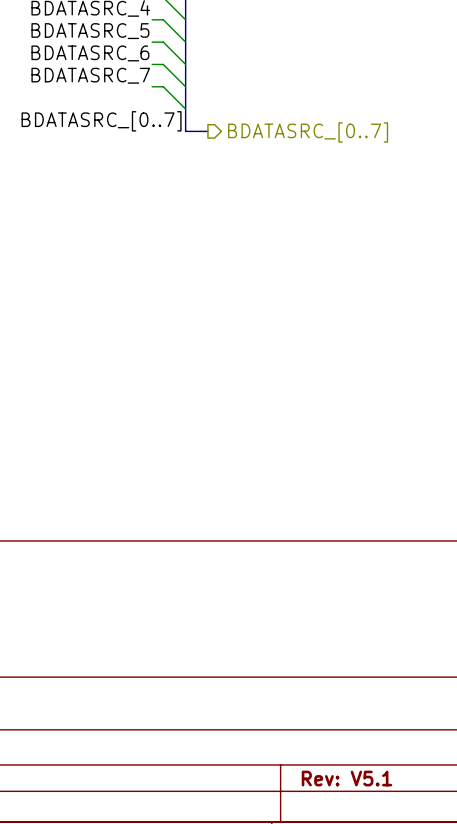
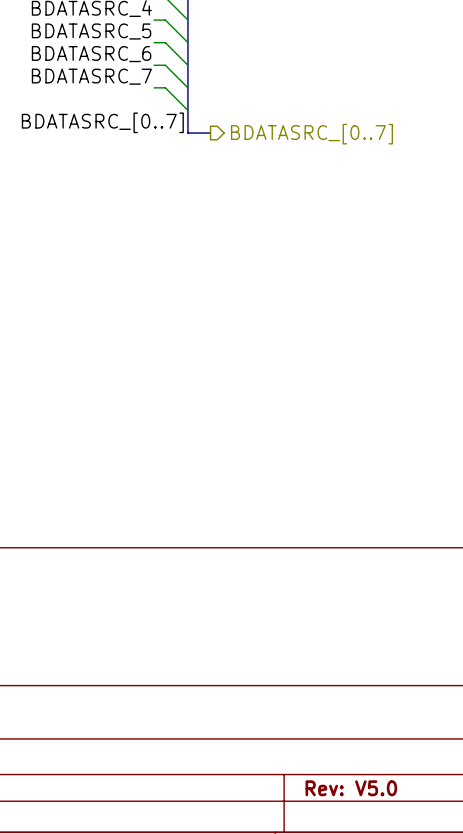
title block: Rev: V5.1 (346, 778) -> Rev: V5.0 (351, 788)

